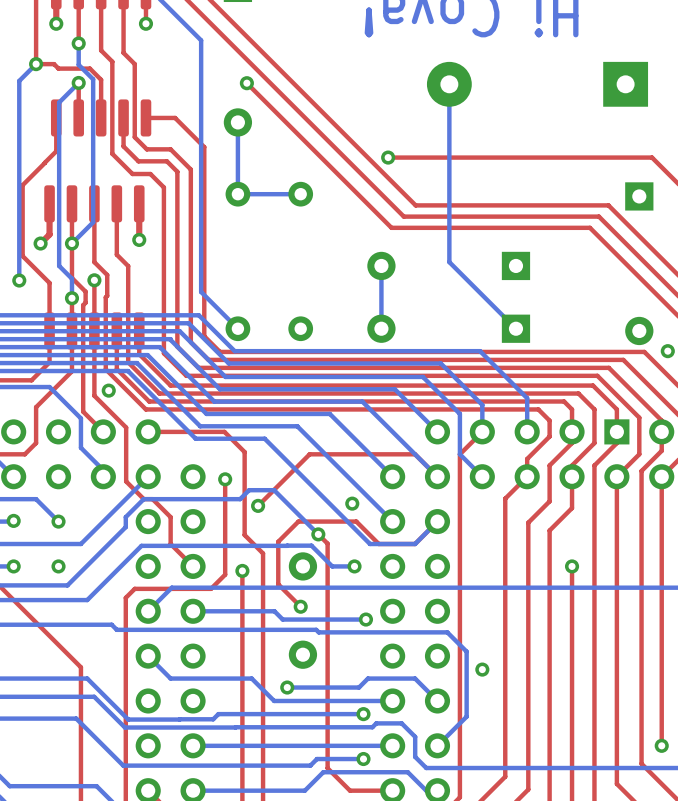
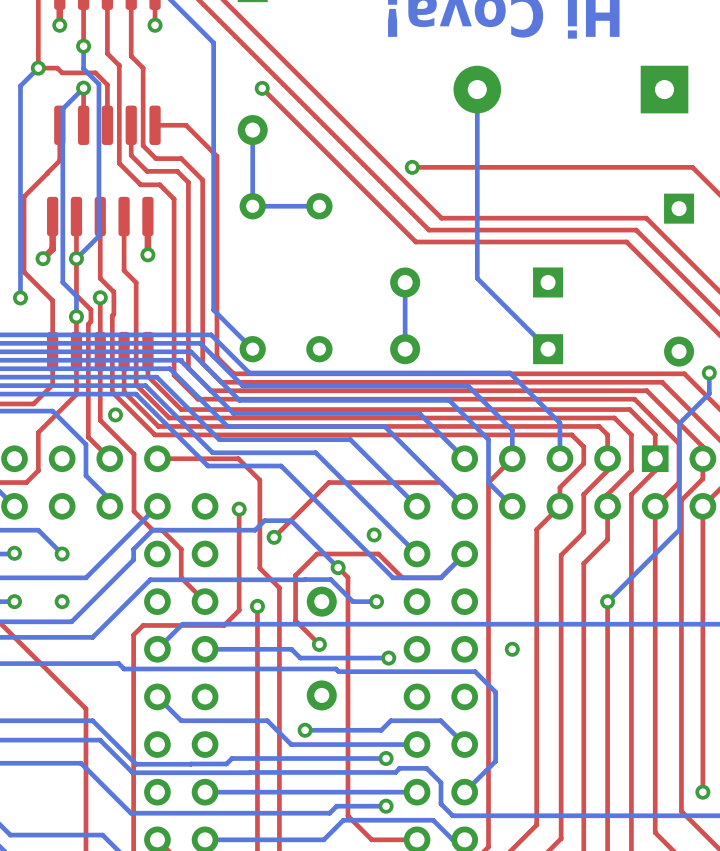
bottom track: none -> (709, 372) (709, 393) (679, 423) (679, 529) (607, 601)
via position: (482, 669) -> (512, 649)

